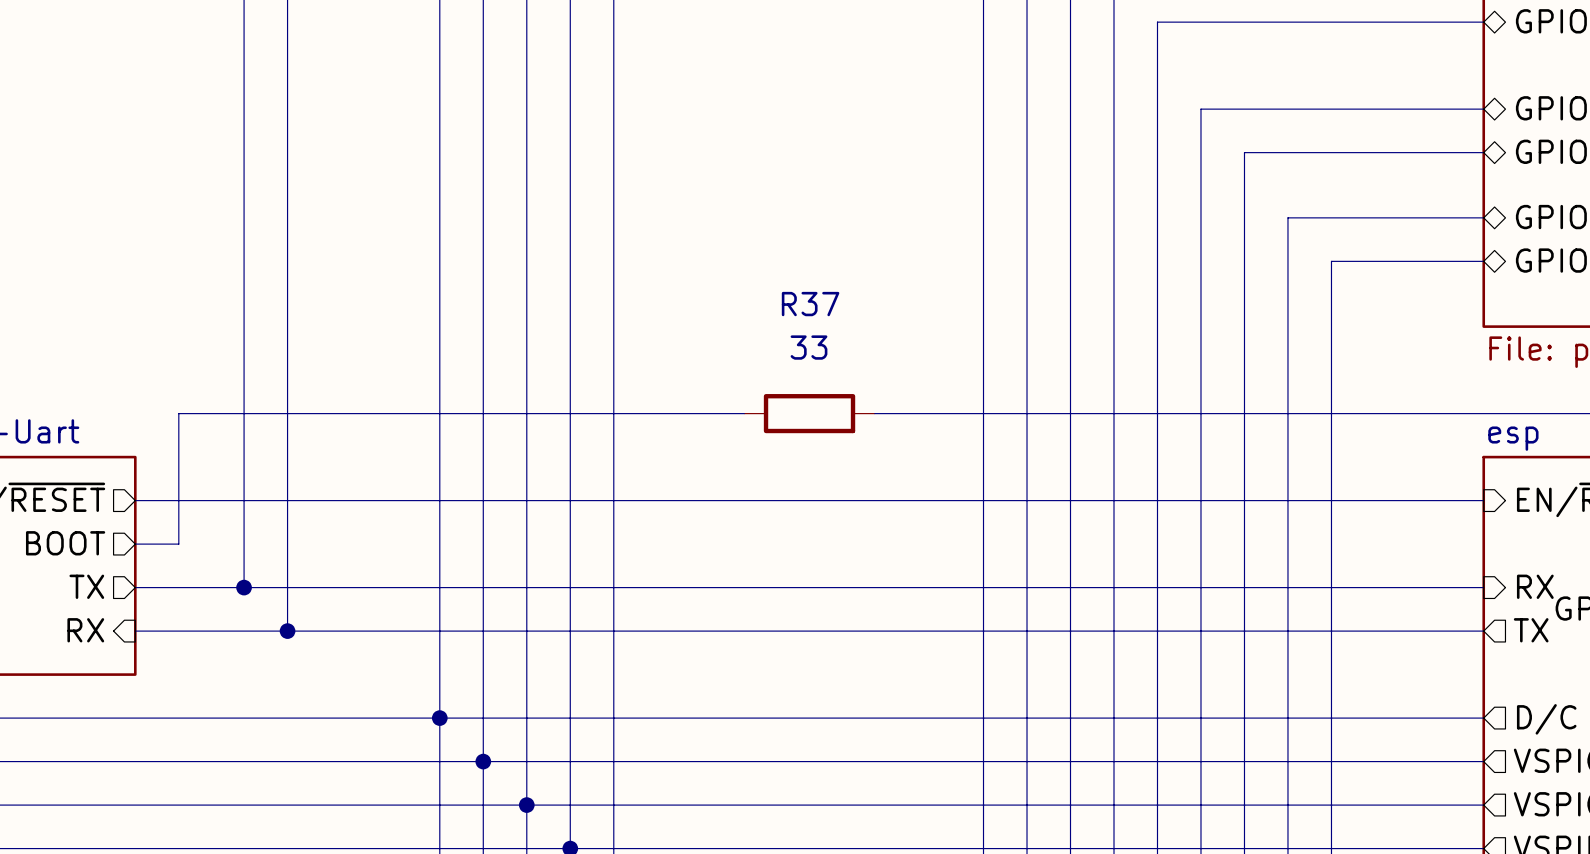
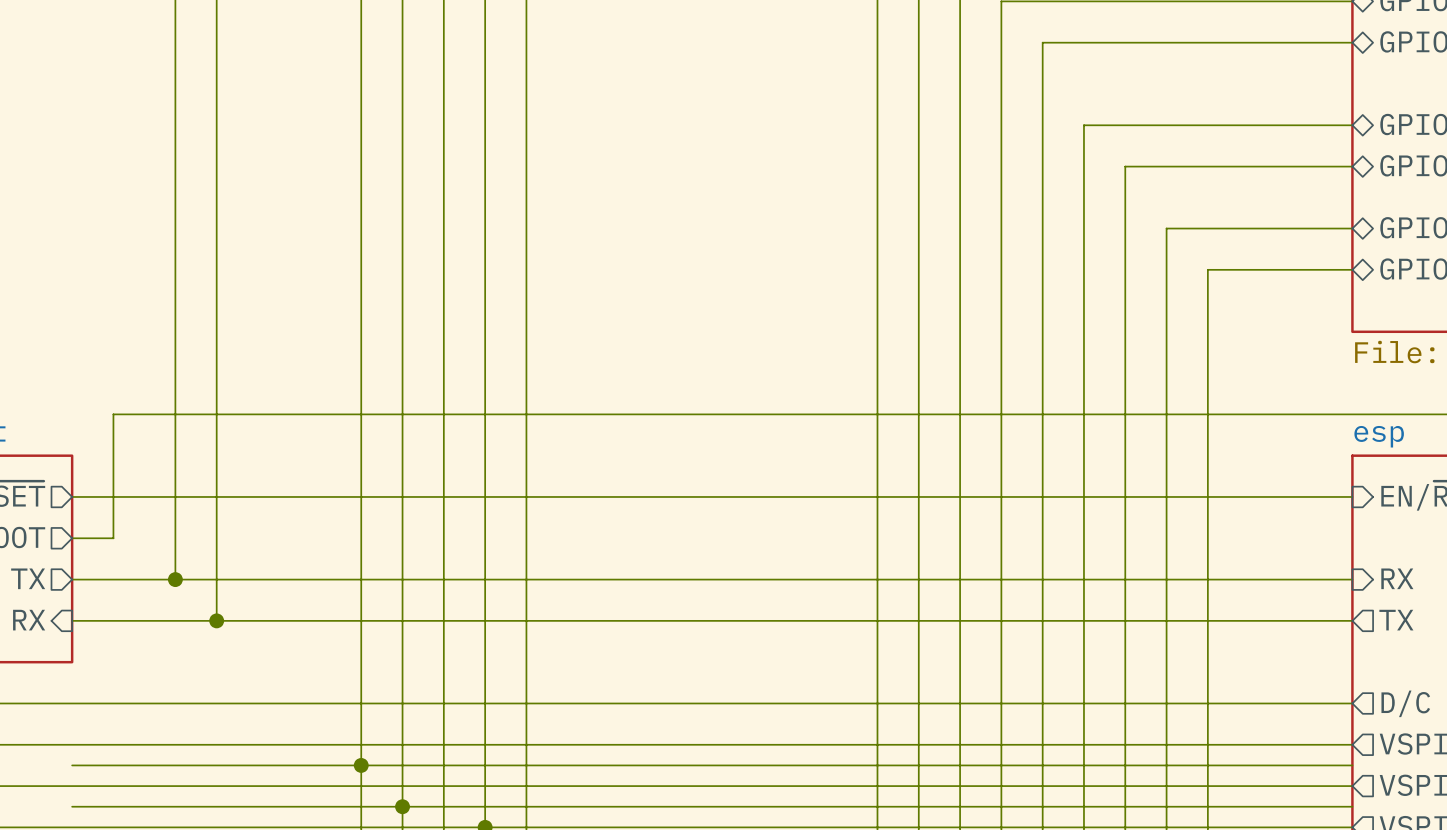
wire: none -> (650, 414) (774, 414)
R37: 33 (809, 413) -> none
junction: (439, 718) -> none
junction: (483, 761) -> none
wire: none -> (72, 765) (1352, 765)
junction: none -> (361, 765)
junction: (526, 805) -> none
wire: none -> (72, 806) (1352, 806)
junction: none -> (402, 806)

